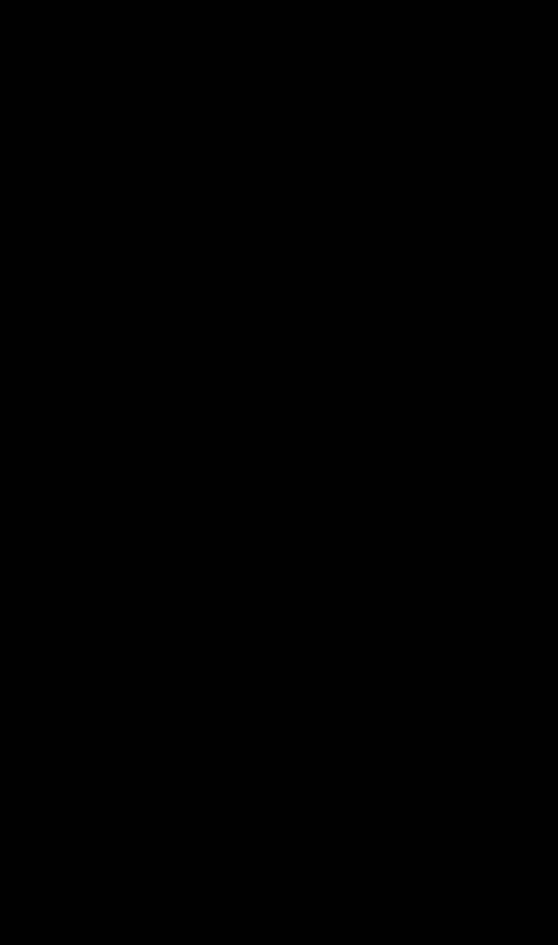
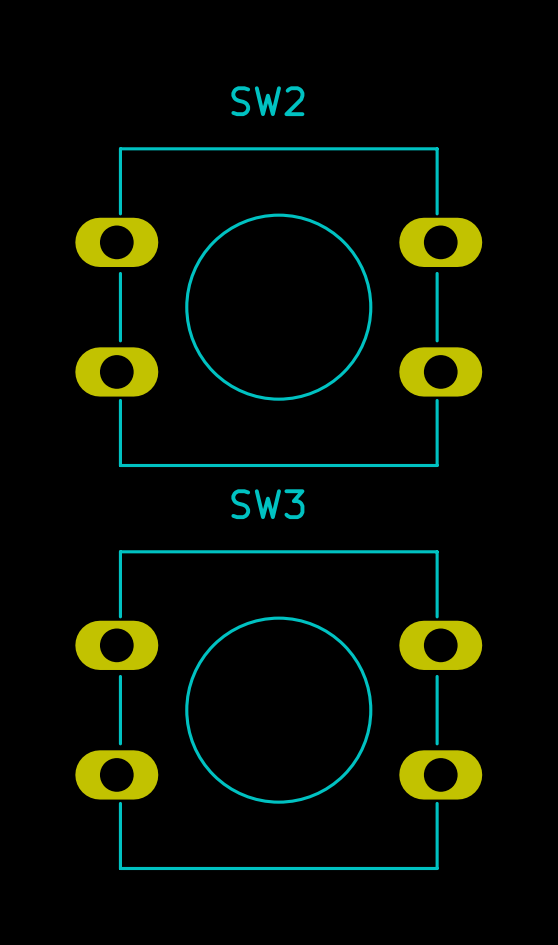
SW2: none -> (278, 307)
SW3: none -> (278, 710)

